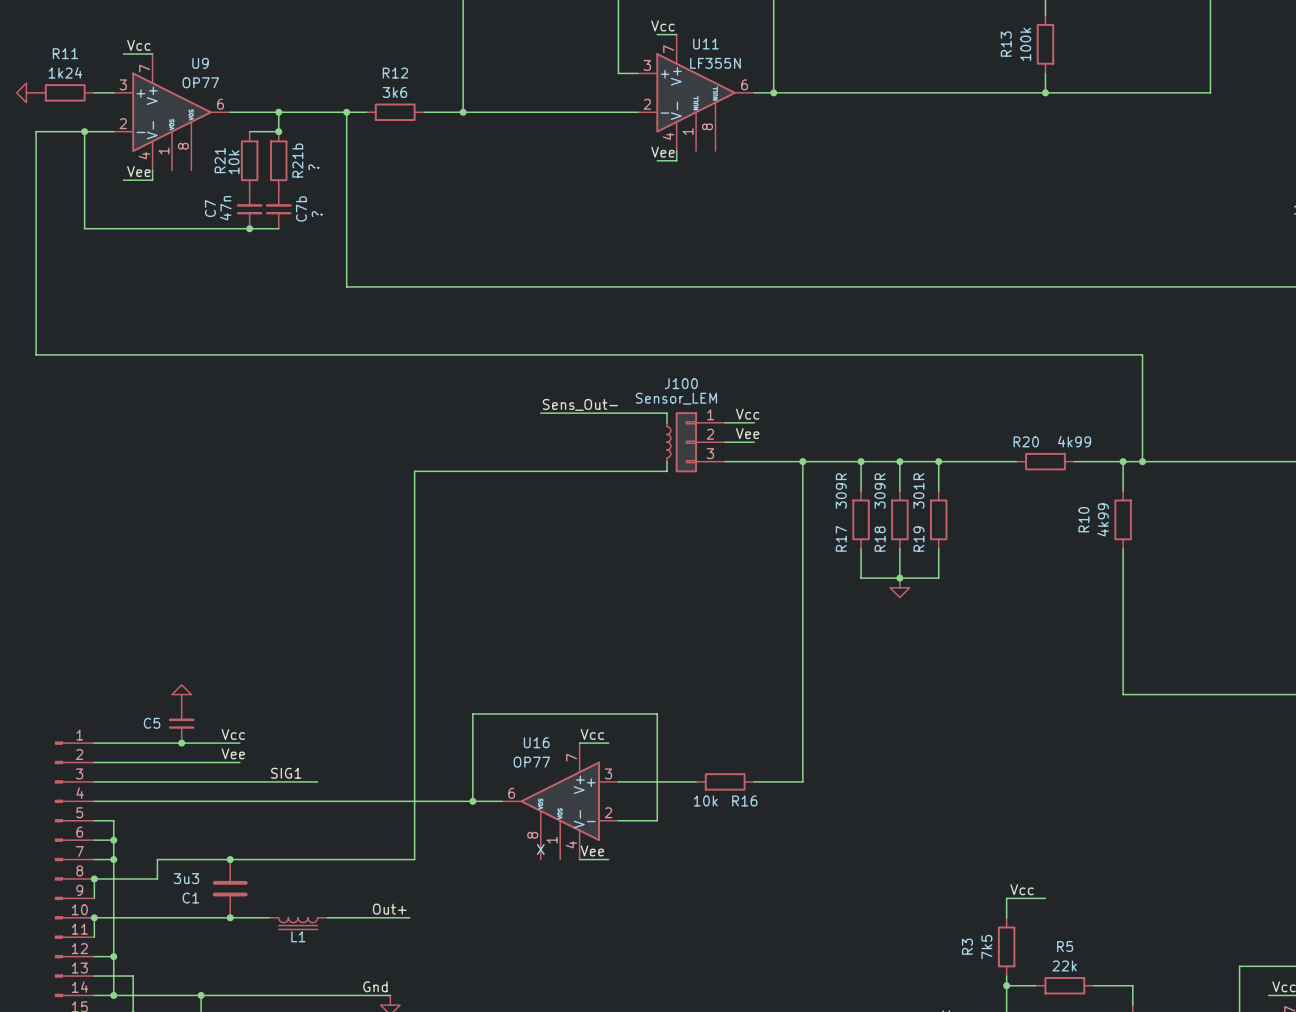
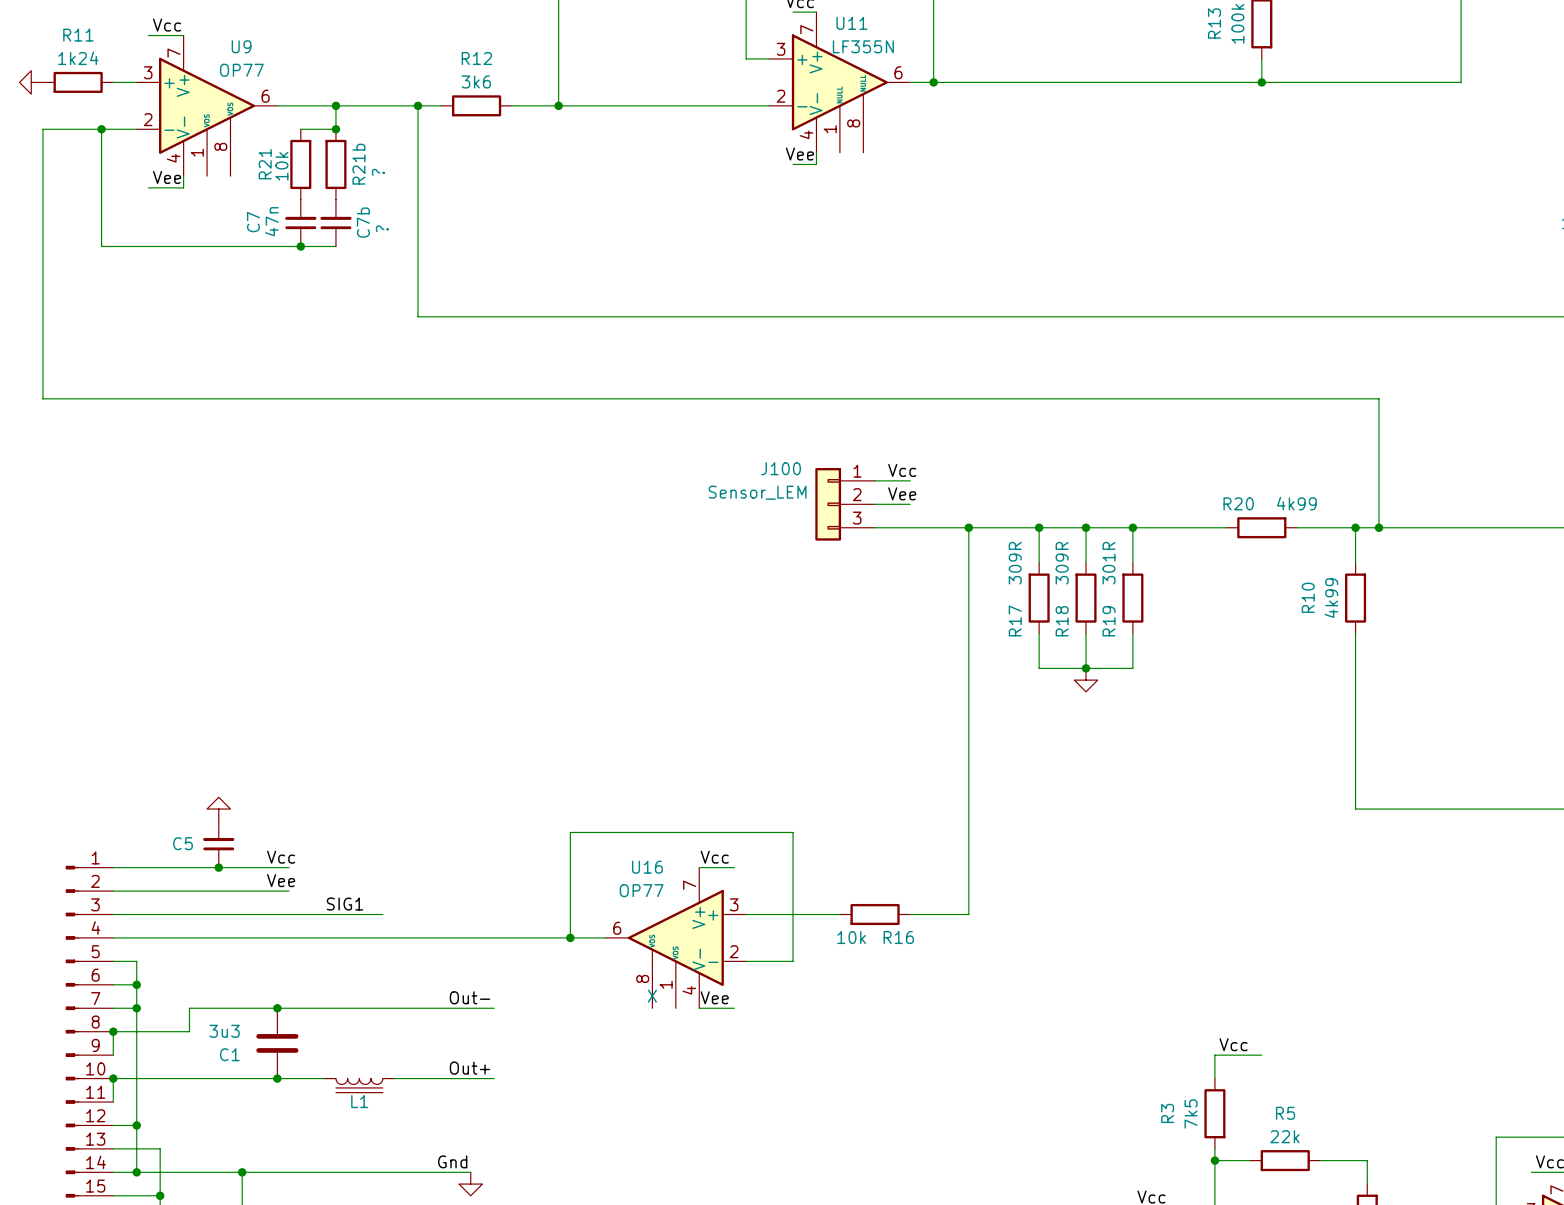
J100 name position: J100 (681, 383) -> J100 (781, 468)
J100 value position: Sensor_LEM (676, 398) -> Sensor_LEM (757, 492)
label: Sens_Out- (580, 404) -> none
wire: (540, 413) (666, 413) (666, 422) -> none
part: (668, 442) -> none
wire: (666, 461) (666, 471) (414, 471) (414, 859) (409, 859) -> none
label: none -> Out- (469, 997)

